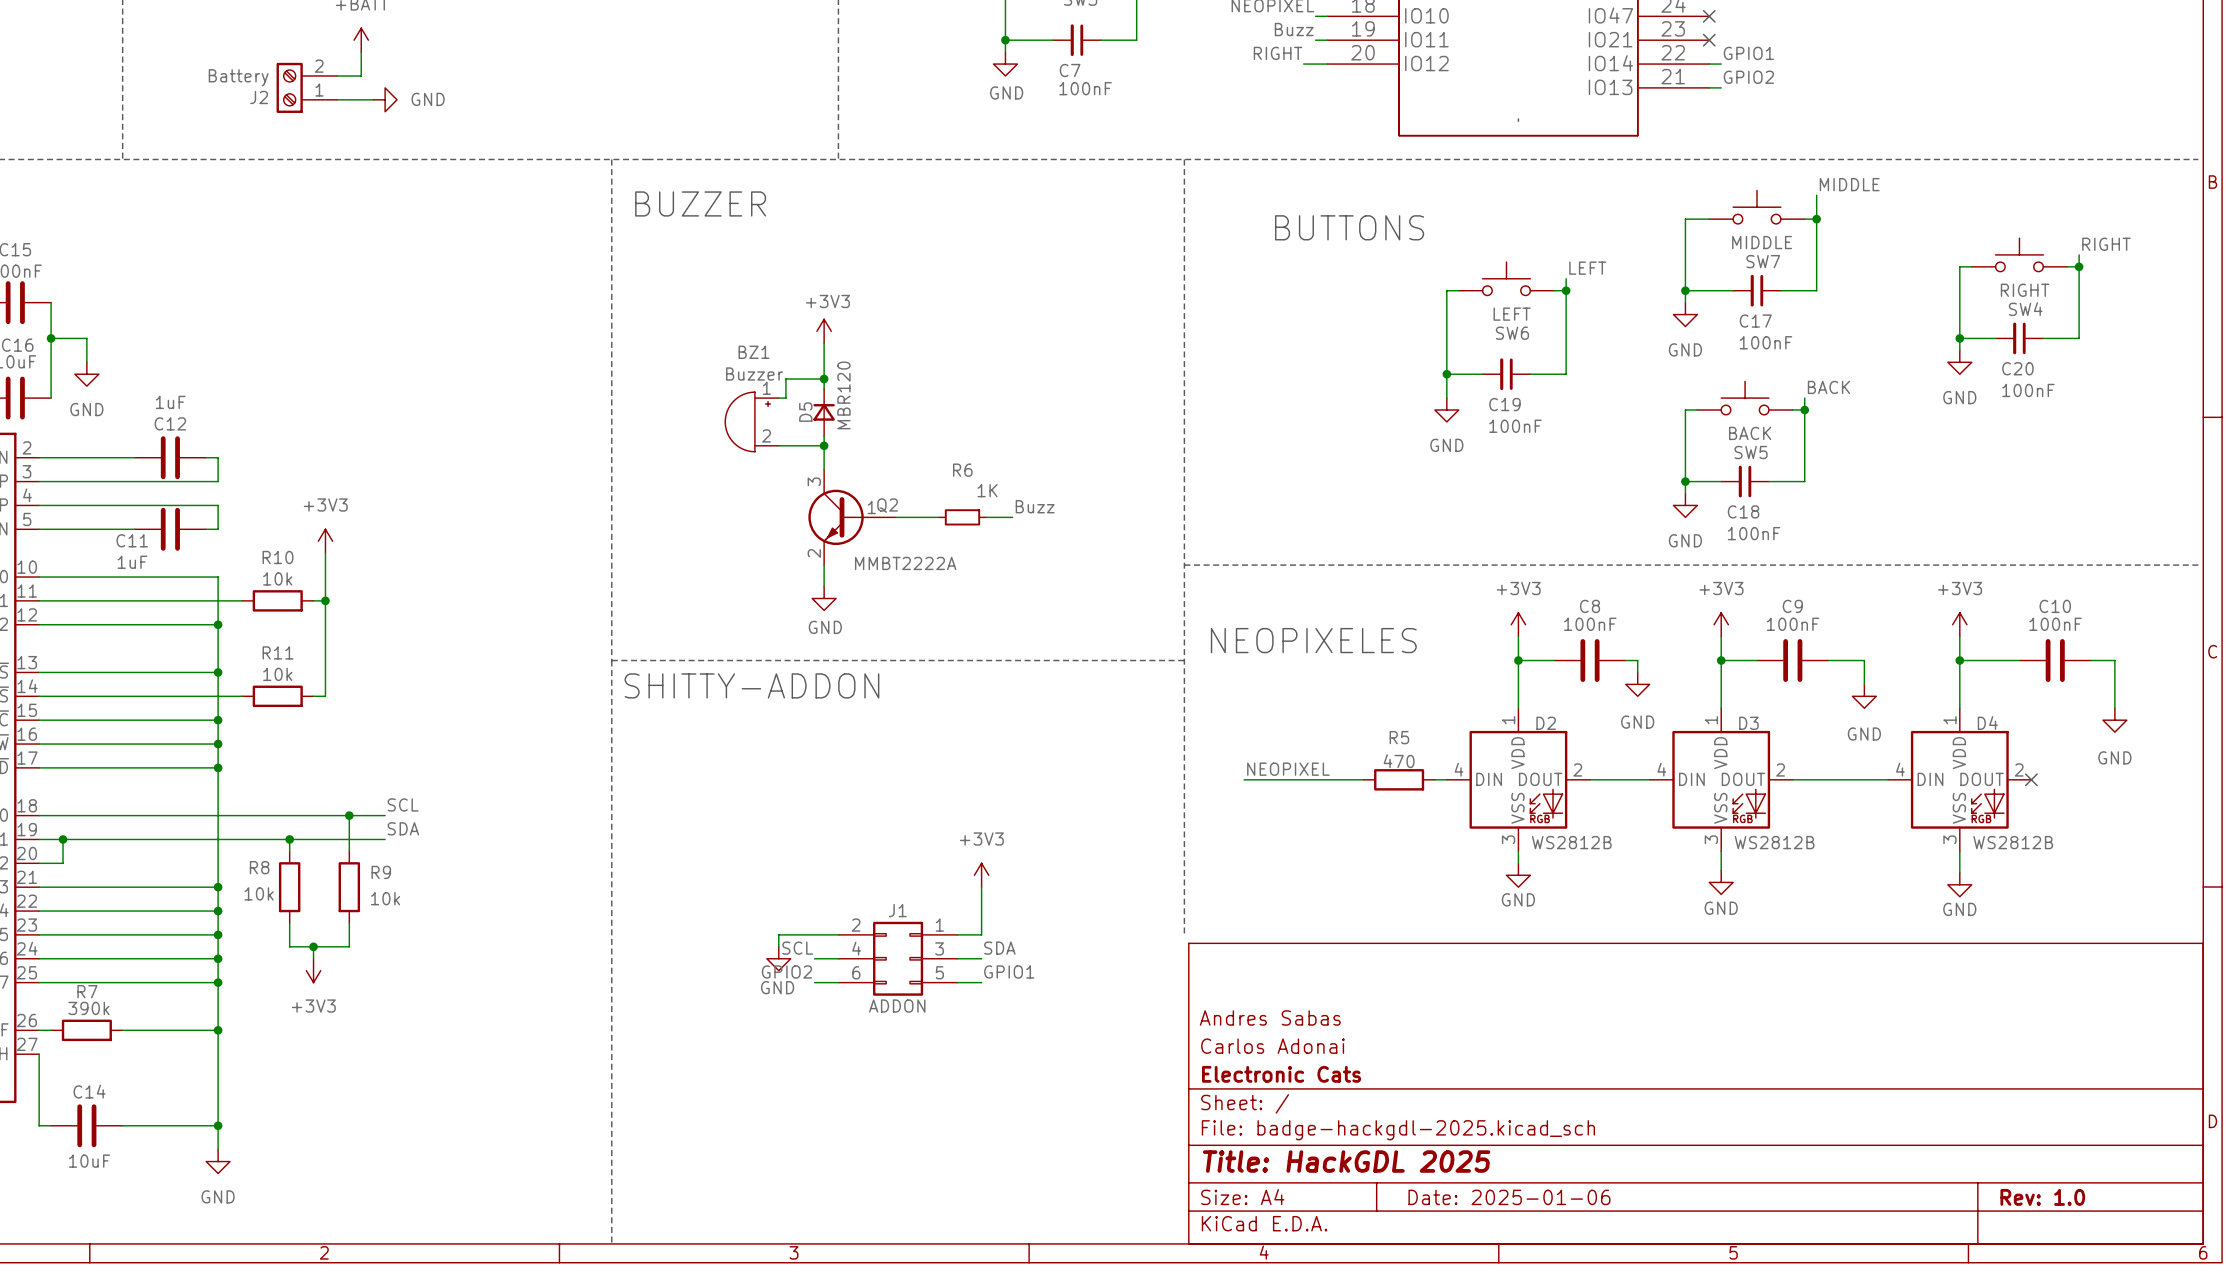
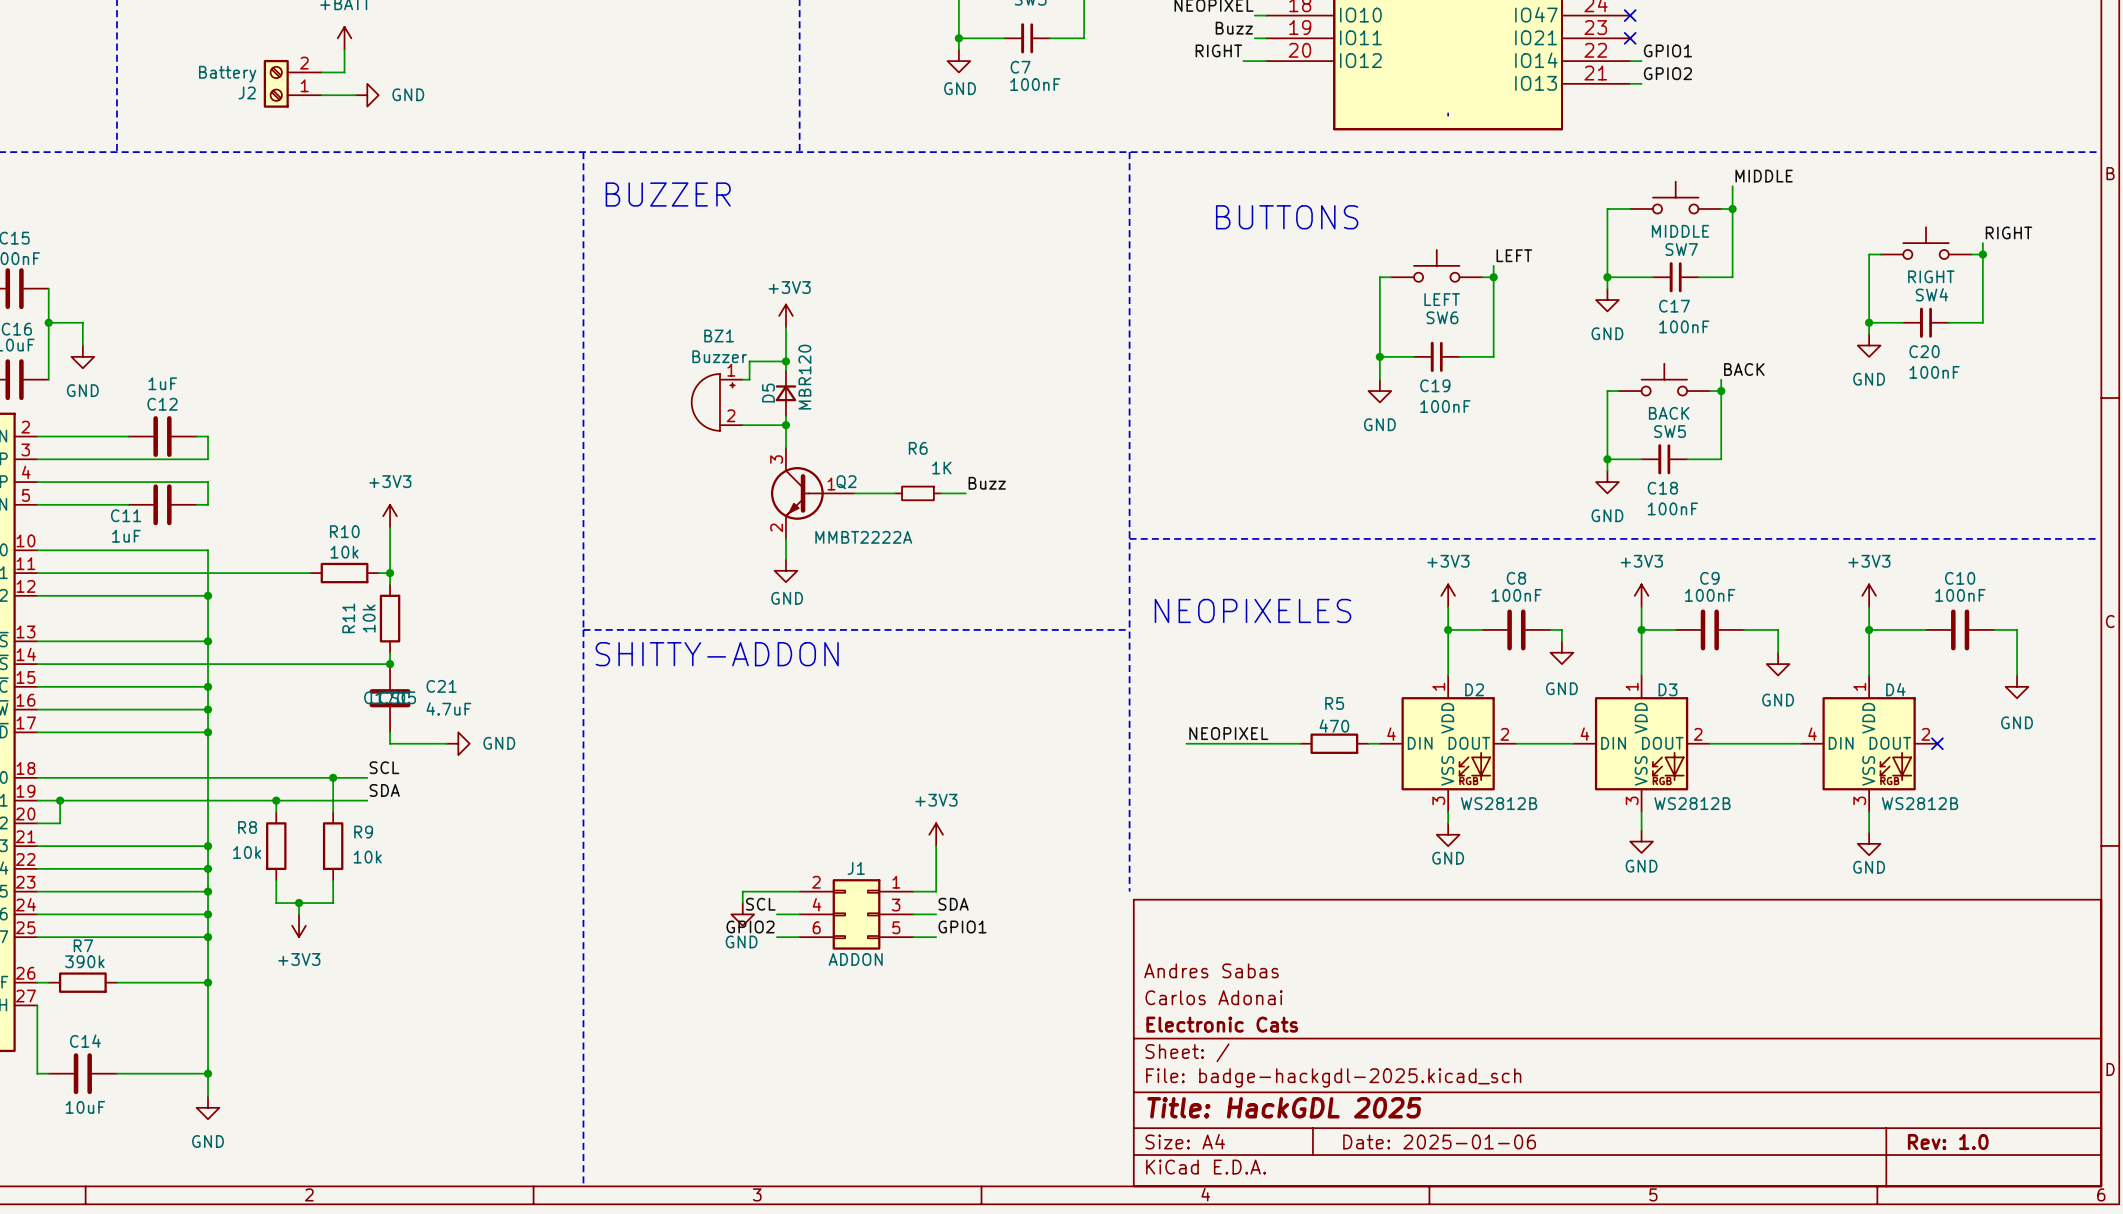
power symbol position: +3V3 (325, 541) -> +3V3 (390, 516)
wire: (325, 553) (325, 696) -> (390, 652) (390, 664) (310, 664)
wire: none -> (390, 527) (390, 584)
wire: none -> (230, 573) (299, 573)
R10 position: (277, 600) -> (344, 573)
junction: (325, 600) -> none
wire: none -> (378, 573) (390, 573)
junction: none -> (390, 573)
R11 name position: R11 (278, 652) -> R11 (348, 618)
R11 value position: 10k (277, 674) -> 10k (369, 618)
wire: none -> (230, 664) (299, 664)
R11 rotation: 0° (277, 696) -> 90° clockwise (390, 618)
R11 position: (277, 696) -> (390, 618)
junction: none -> (390, 664)
C21: none -> 4.7uF (390, 698)
wire: none -> (390, 732) (390, 743) (446, 743)
power symbol: none -> GND (458, 743)

